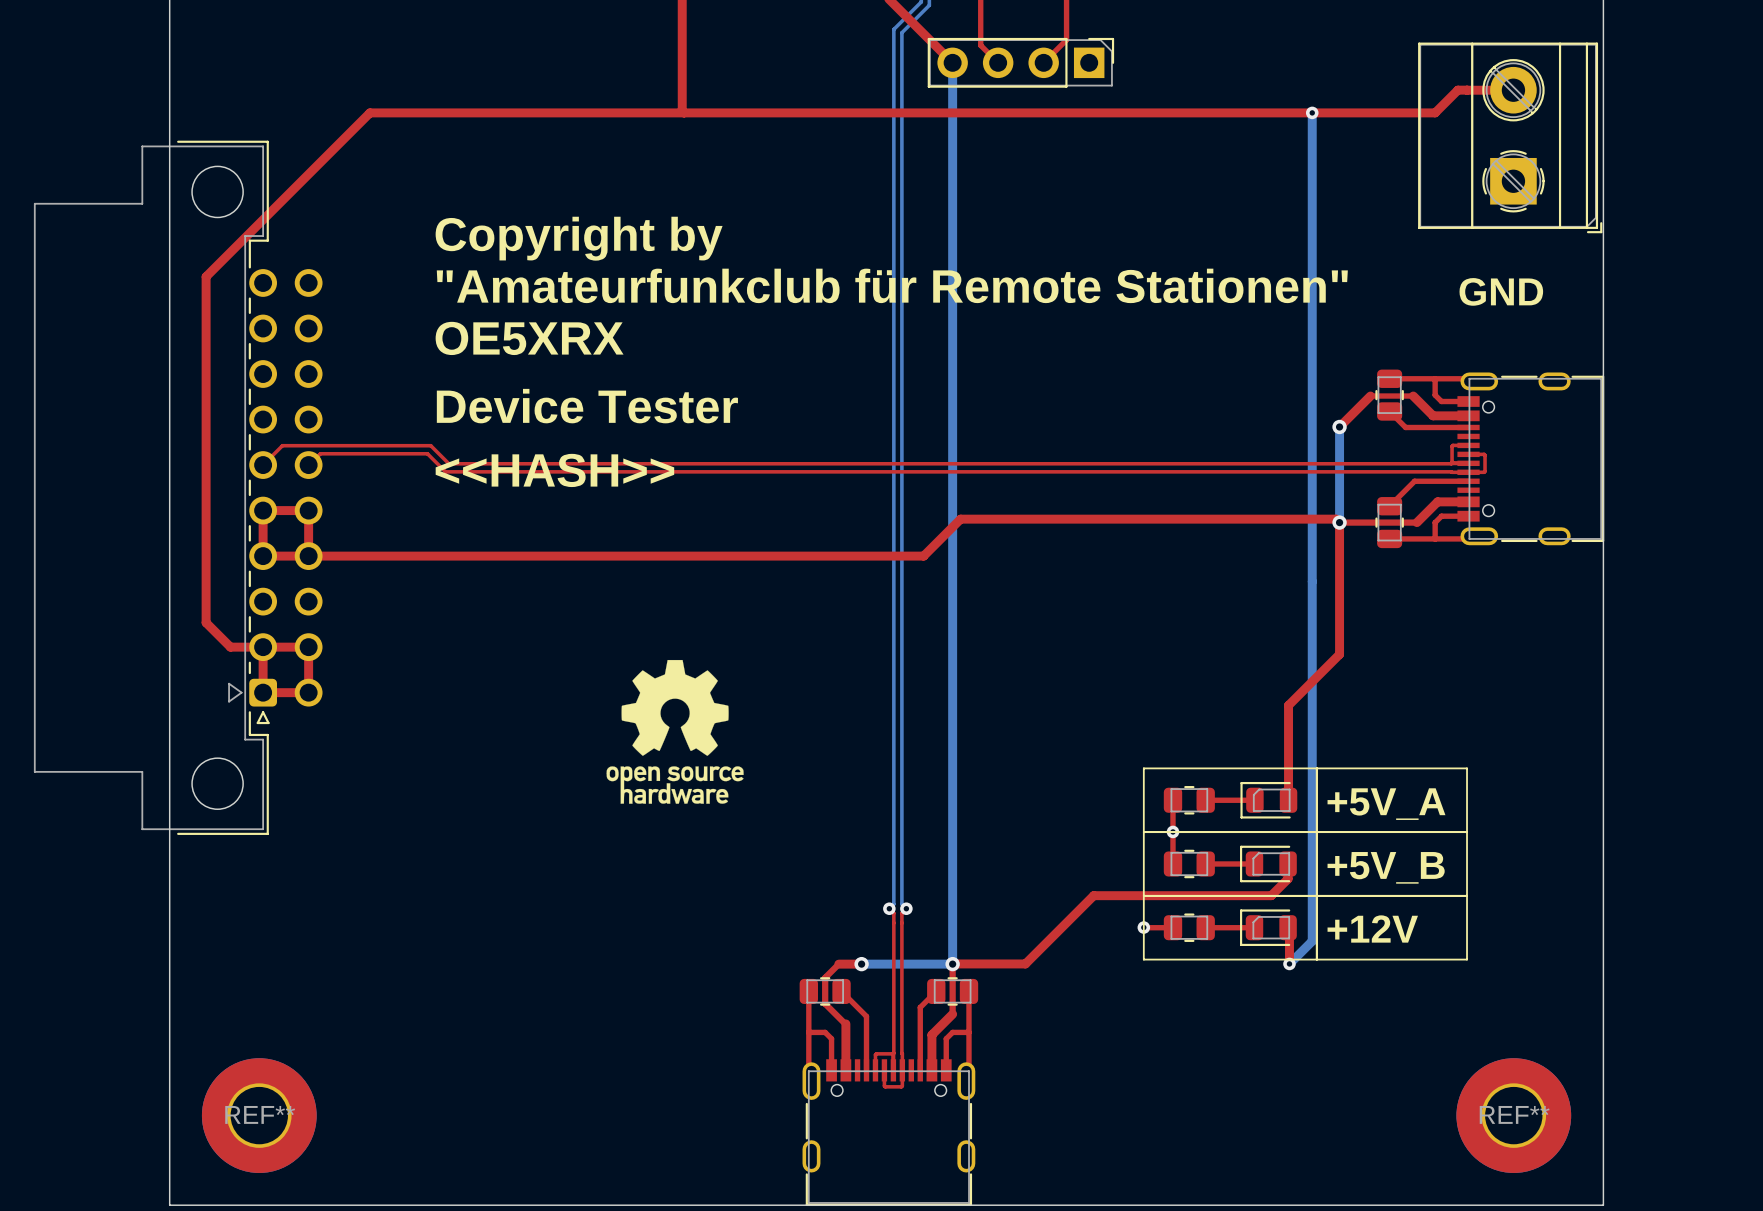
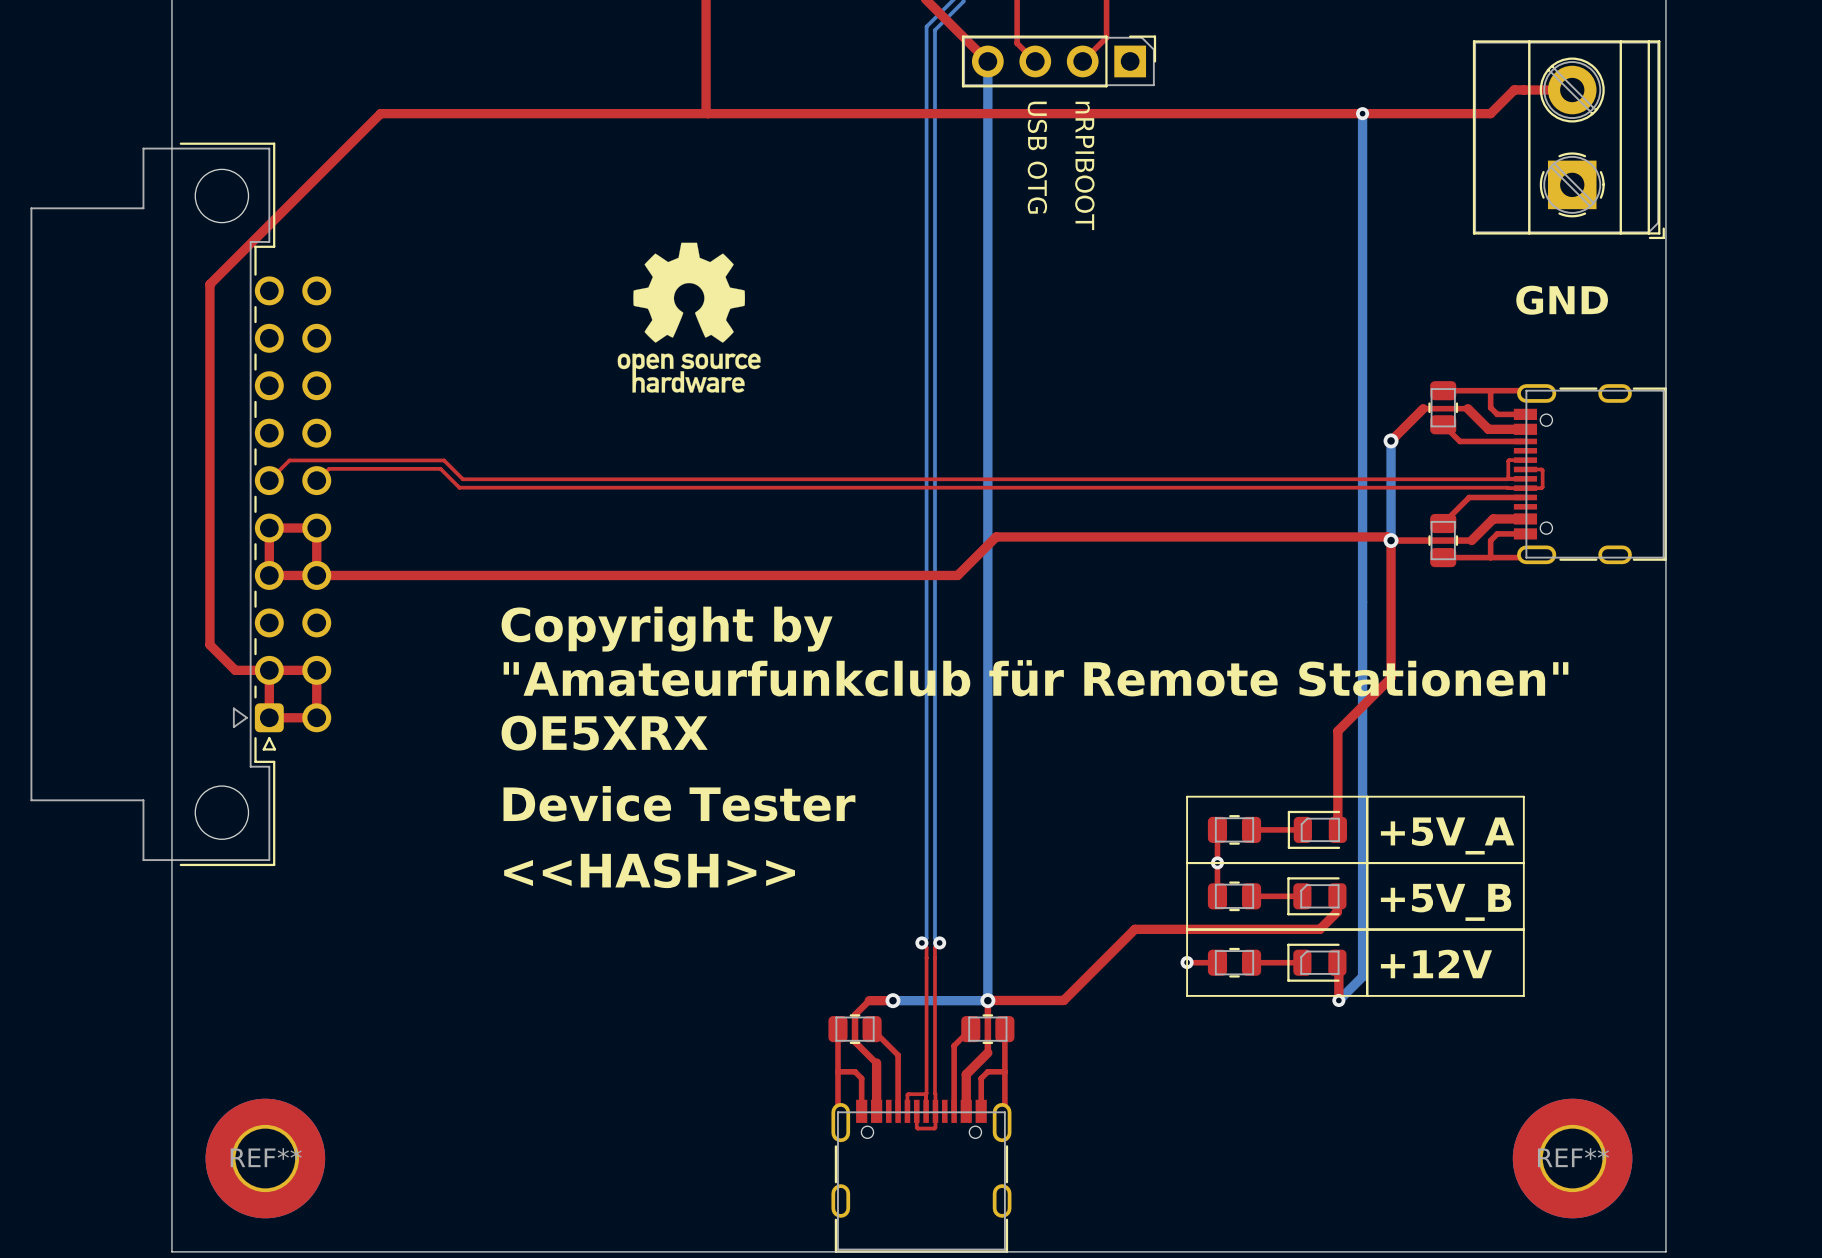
text: none -> USB OTG (1037, 157)
text: none -> nRPIBOOT (1084, 165)
text position: Copyright by (579, 238) -> Copyright by (667, 629)
text position: "Amateurfunkclub für Remote Stationen" (892, 285) -> "Amateurfunkclub für Remote Stationen" (1036, 678)
text position: OE5XRX (529, 338) -> OE5XRX (604, 733)
text position: Device Tester (587, 406) -> Device Tester (679, 803)
text position: <<HASH>> (554, 470) -> <<HASH>> (649, 870)
drawing position: (675, 731) -> (689, 317)

